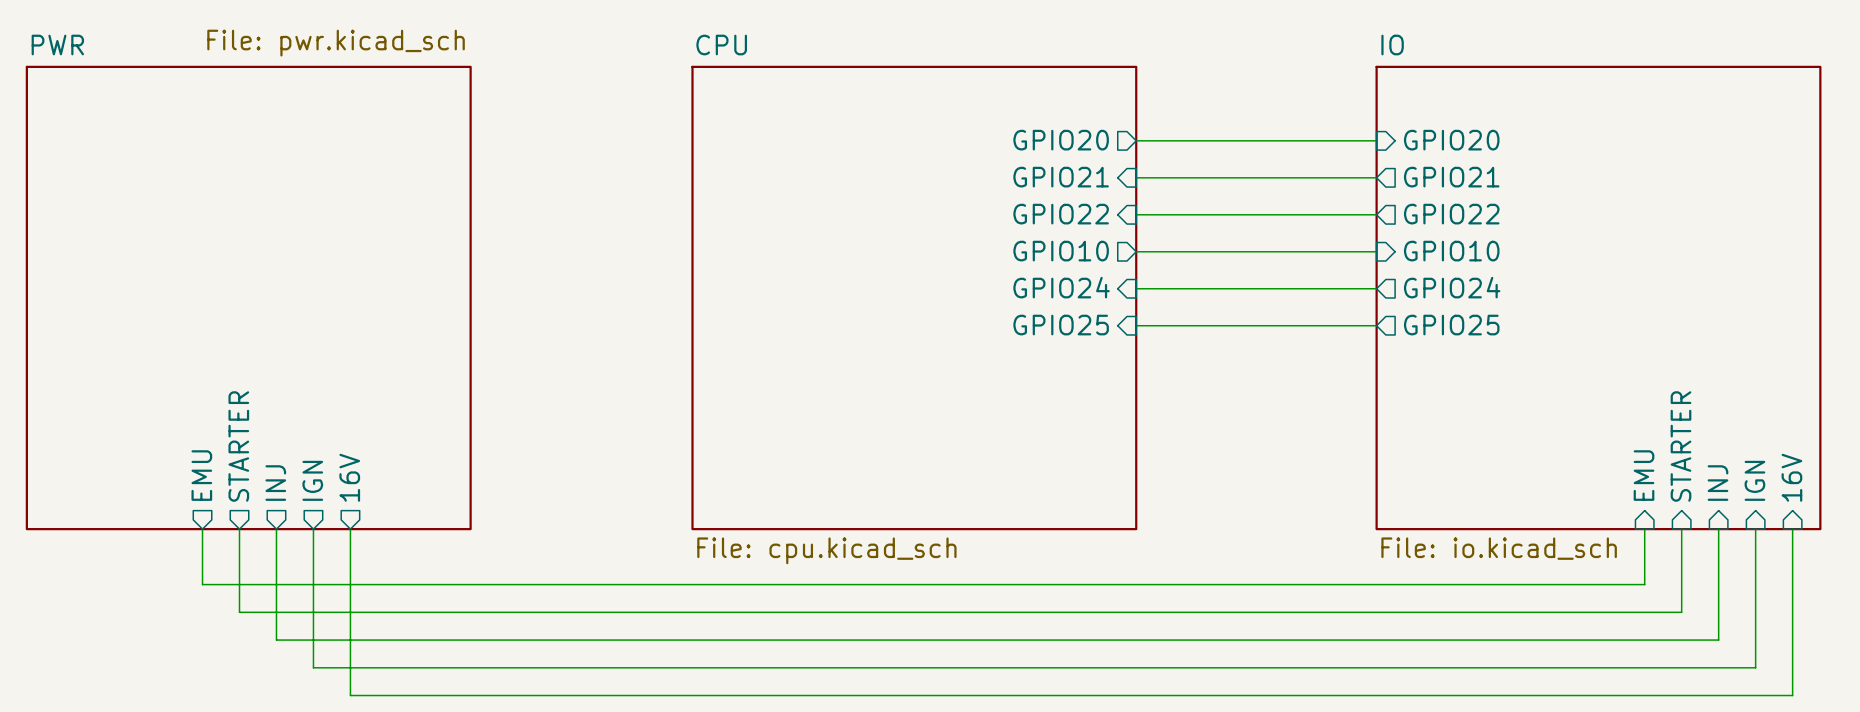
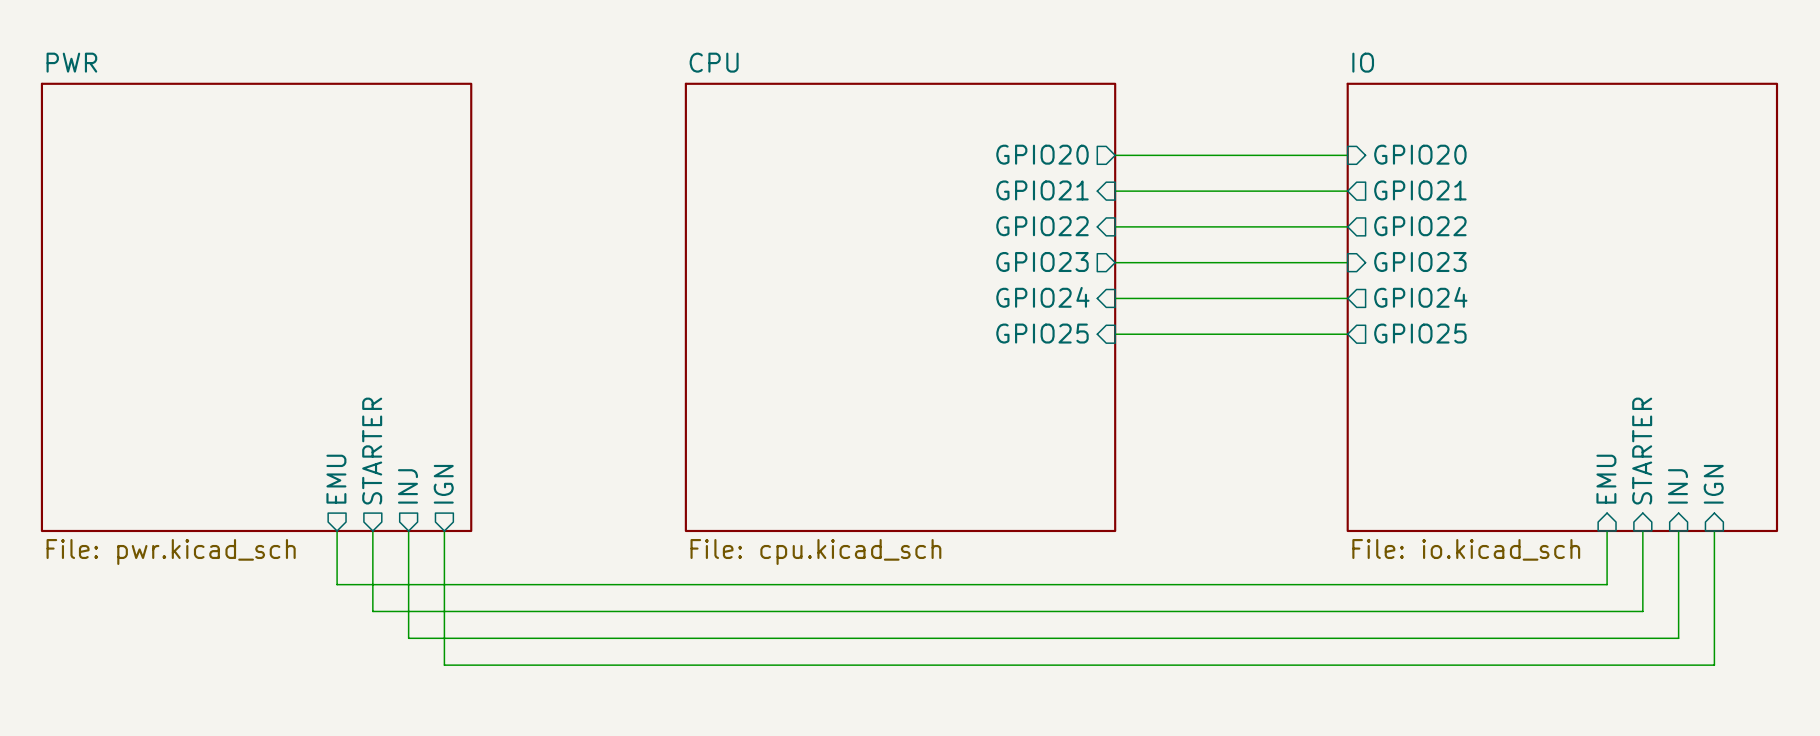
sheet PWR value position: File: pwr.kicad_sch (336, 43) -> File: pwr.kicad_sch (171, 551)
sheet pin: GPIO10 (1061, 251) -> GPIO23 (1042, 262)
sheet pin: GPIO10 (1451, 251) -> GPIO23 (1420, 262)
sheet pin position: STARTER (238, 446) -> STARTER (372, 451)
sheet pin position: EMU (201, 475) -> EMU (336, 479)
sheet pin: 16V (349, 477) -> none
sheet pin: 16V (1791, 477) -> none
sheet pin position: IGN (312, 480) -> IGN (443, 484)
sheet pin position: INJ (275, 483) -> INJ (407, 486)
wire: (202, 529) (202, 584) (331, 584) -> (337, 530) (337, 584)
wire: (239, 529) (239, 612) (368, 612) -> (372, 530) (372, 611)
wire: (276, 529) (276, 640) (405, 640) -> (408, 530) (408, 638)
wire: (313, 529) (313, 667) (442, 667) -> (444, 530) (444, 665)
wire: (350, 529) (350, 695) (1792, 695) (1792, 529) -> none

